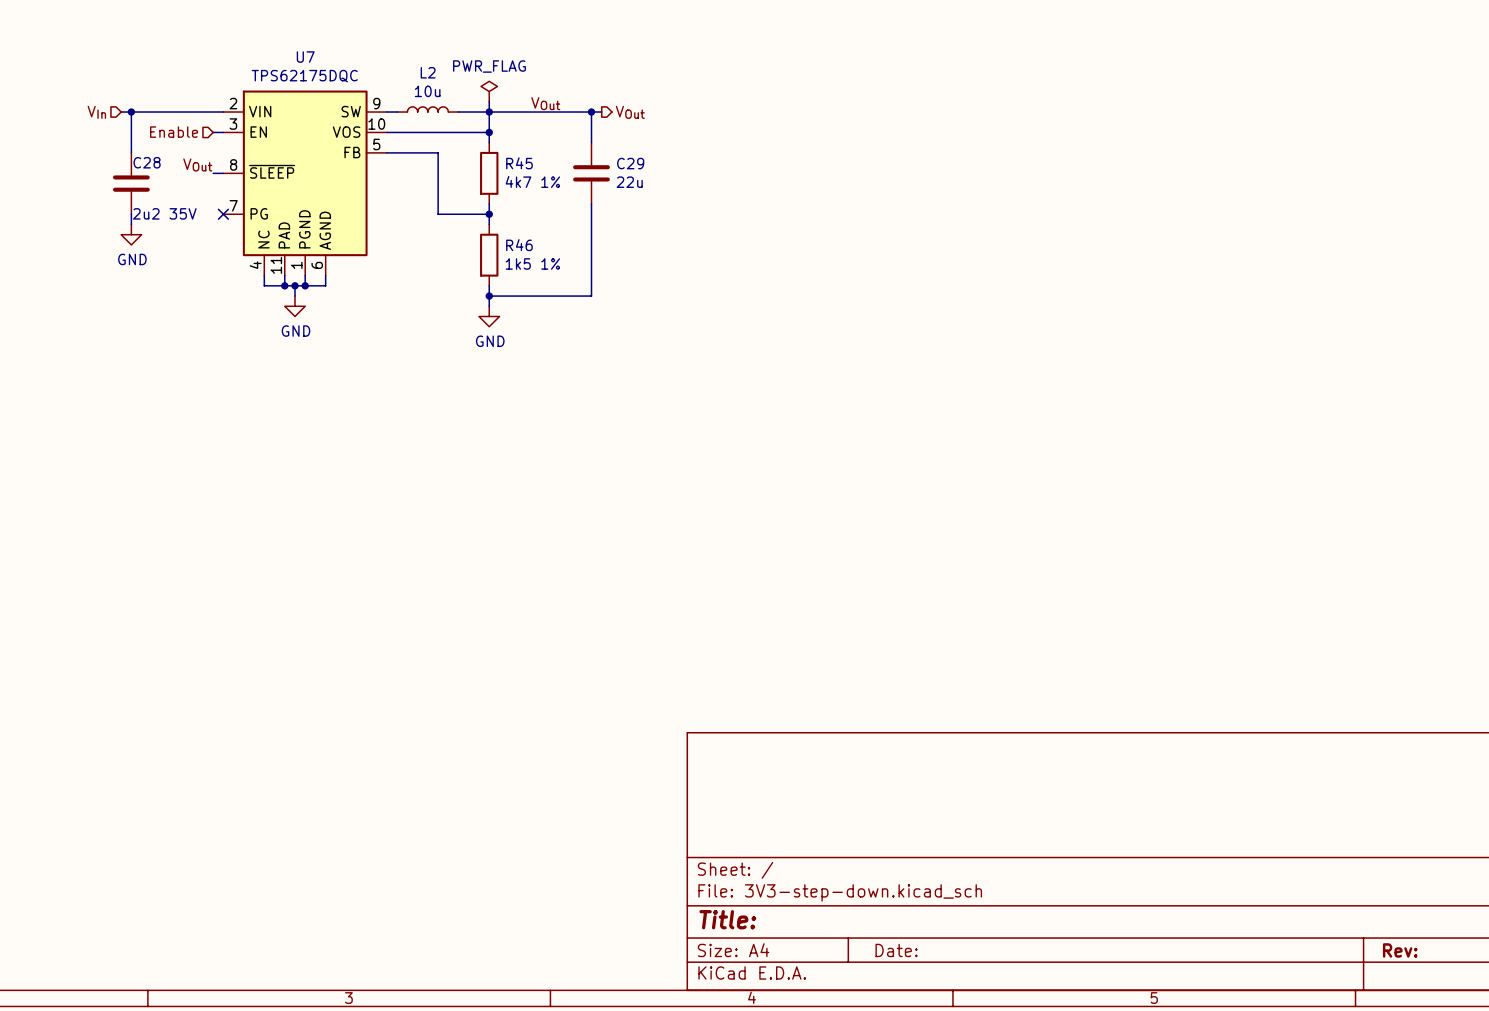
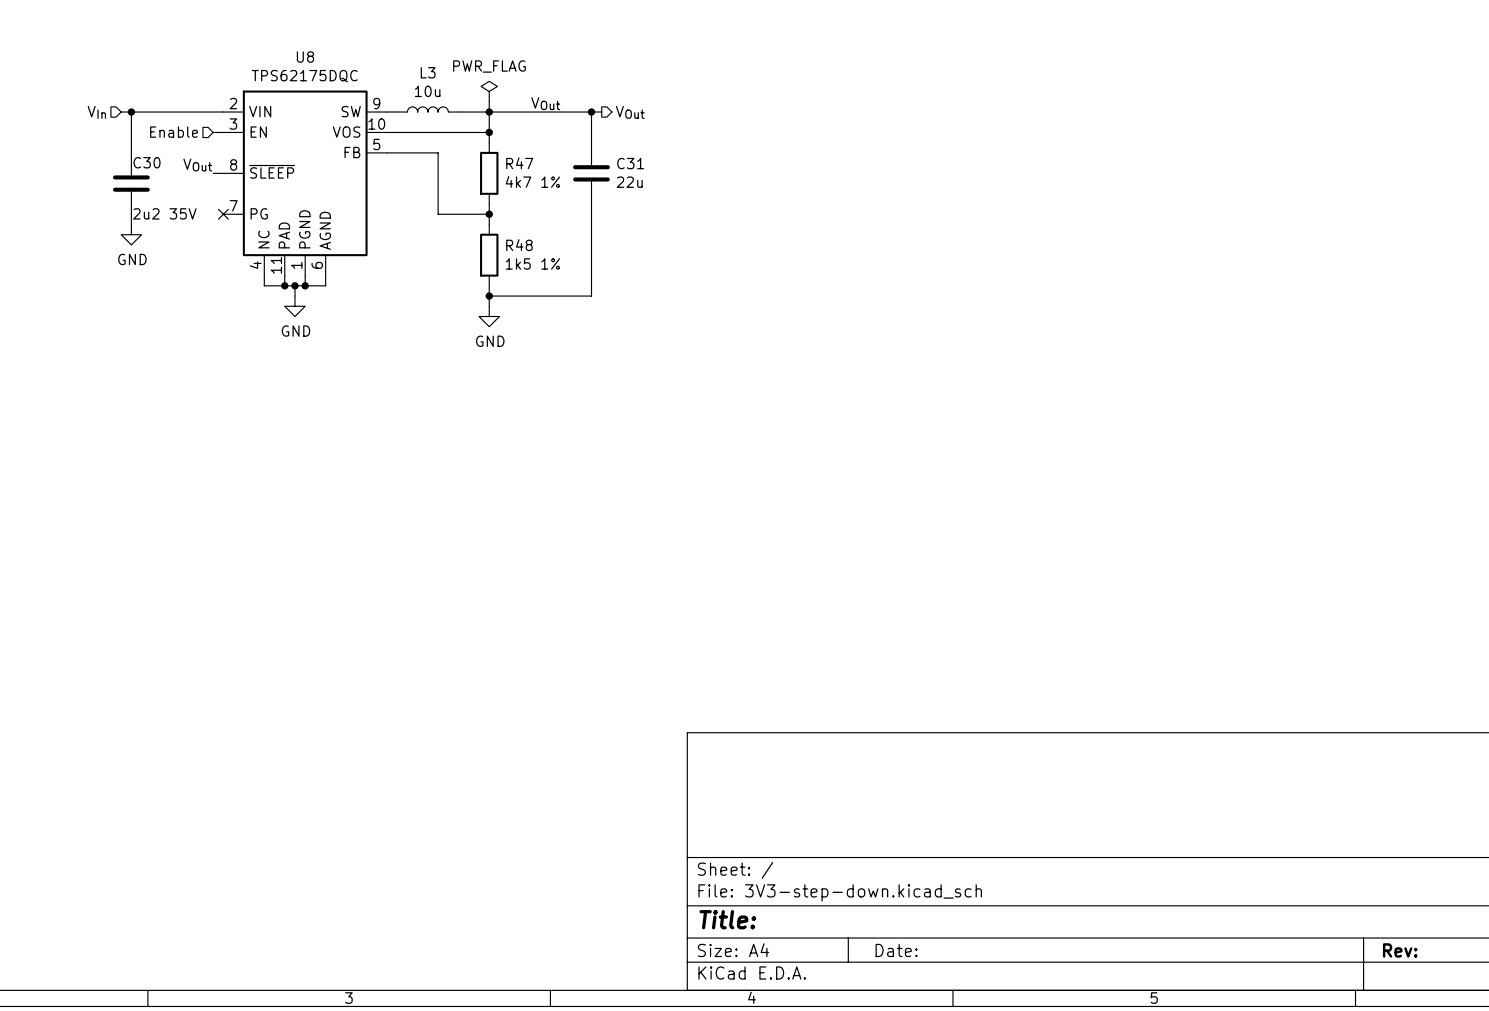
U7 name: U7 (305, 57) -> U8 (305, 57)
L2 name: L2 (428, 72) -> L3 (428, 72)
C28 name: C28 (147, 162) -> C30 (147, 162)
R45 name: R45 (519, 163) -> R47 (519, 163)
C29 name: C29 (630, 163) -> C31 (630, 163)
R46 name: R46 (519, 245) -> R48 (519, 245)

